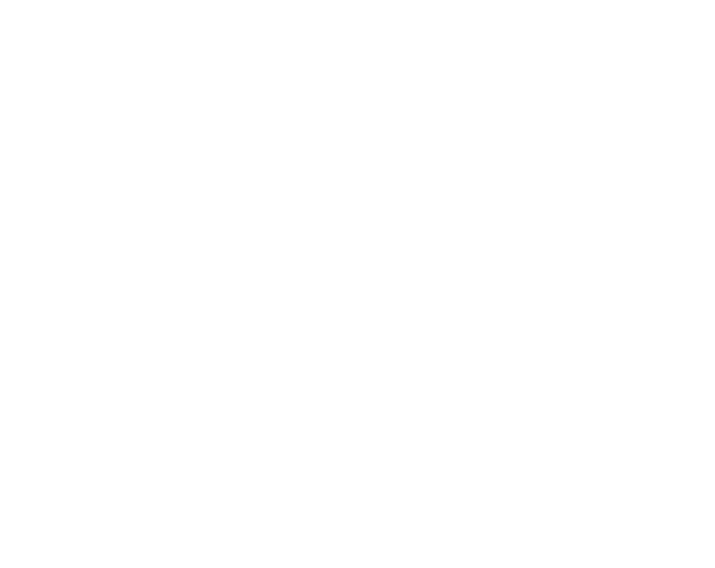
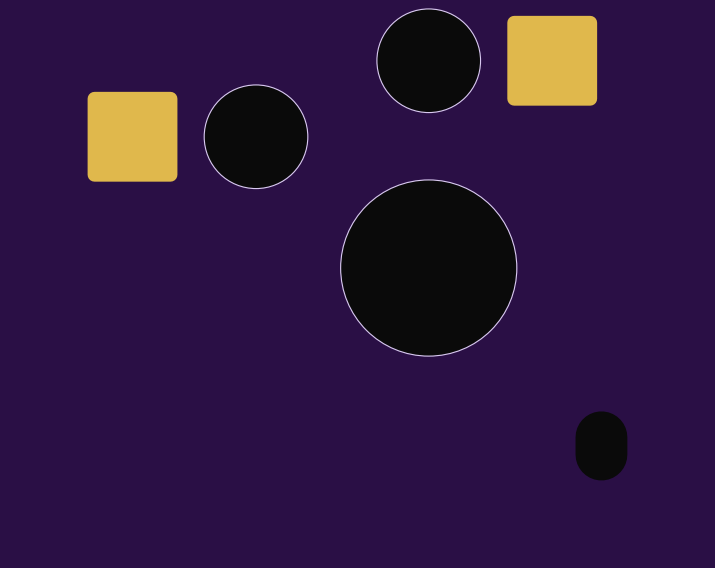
part: none -> (357, 244)

